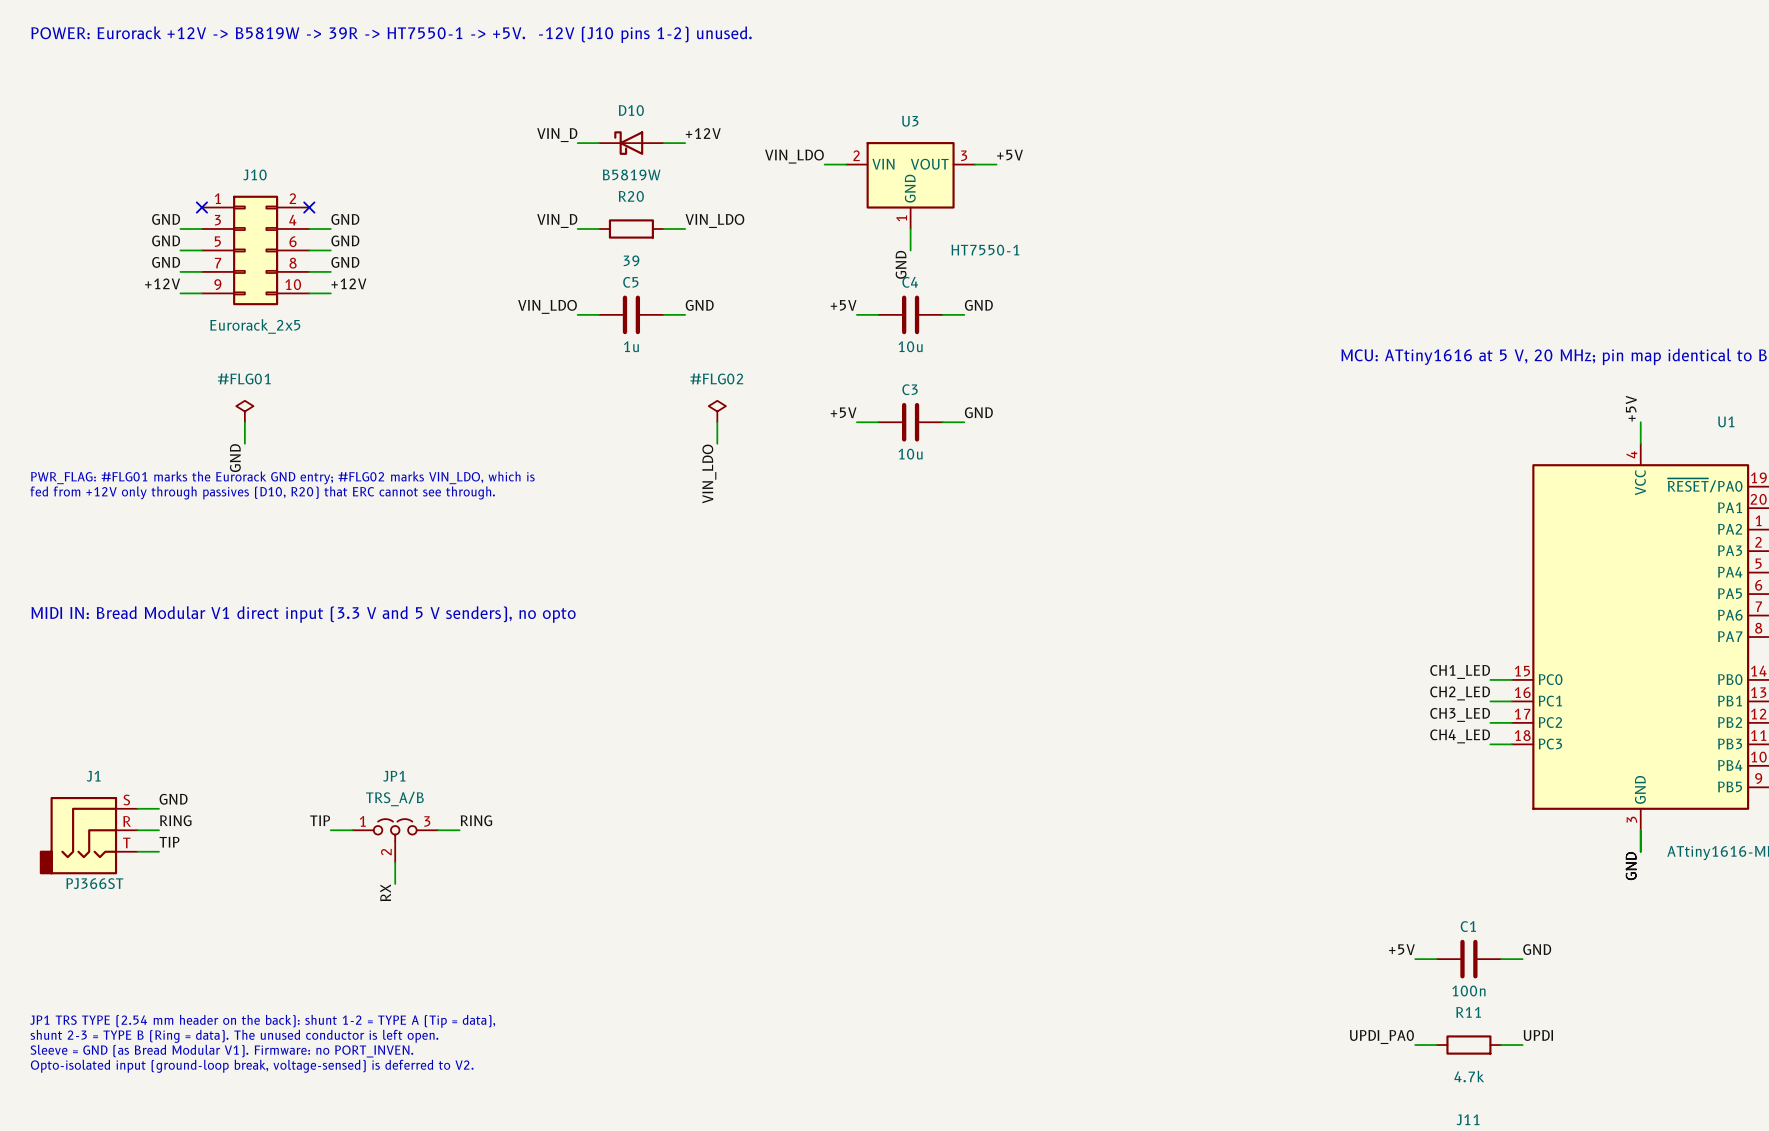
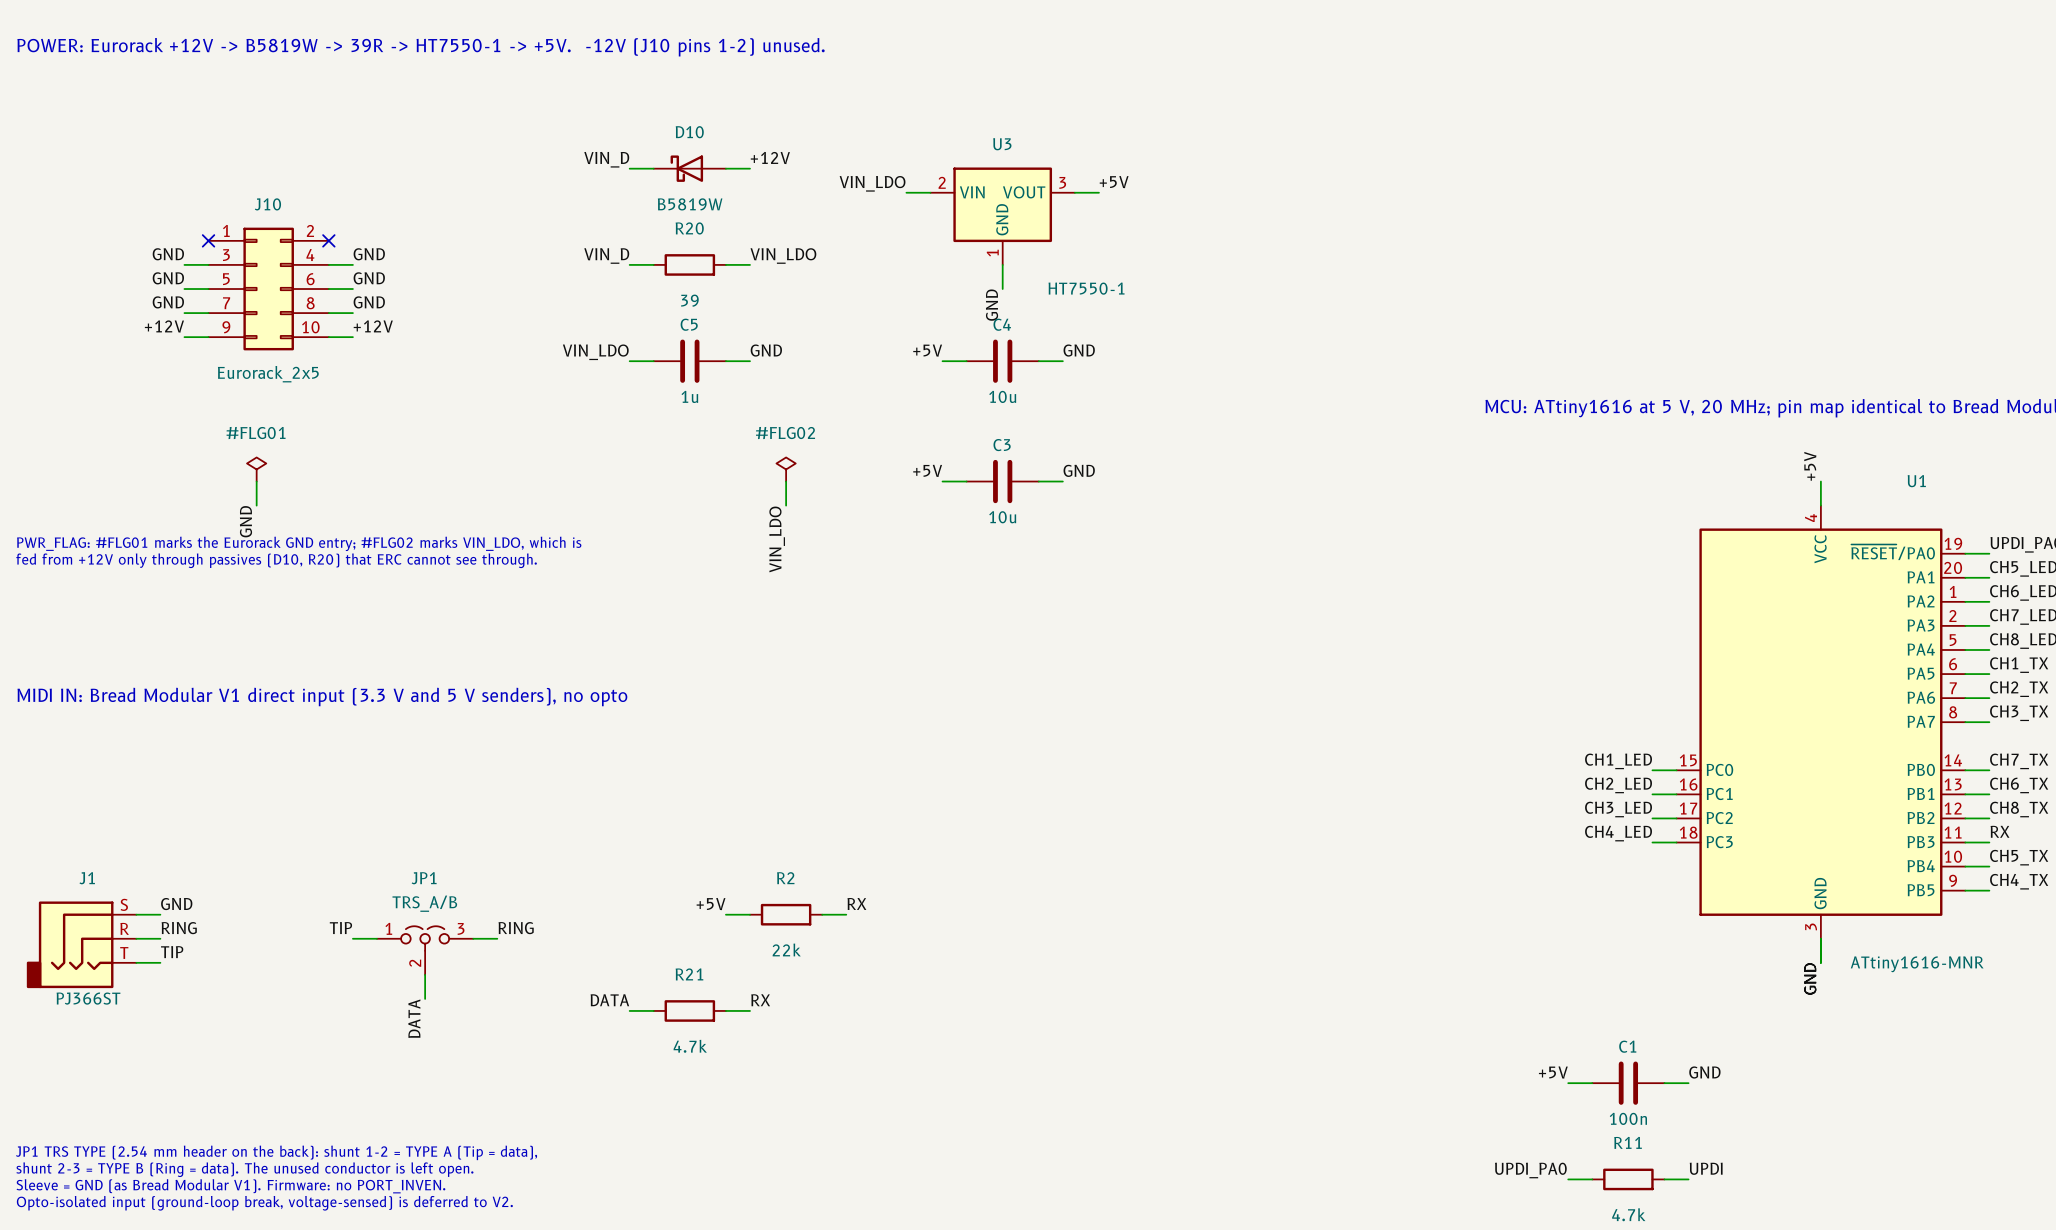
label: none -> +5V (711, 904)
label: none -> RX (856, 903)
wire: none -> (725, 914) (750, 914)
R2: none -> 22k (786, 914)
wire: none -> (822, 914) (846, 914)
label: none -> DATA (609, 1000)
label: none -> RX (760, 1000)
label: RX (385, 892) -> DATA (414, 1018)
wire: none -> (629, 1010) (653, 1010)
R21: none -> 4.7k (689, 1010)
wire: none -> (725, 1010) (750, 1010)

